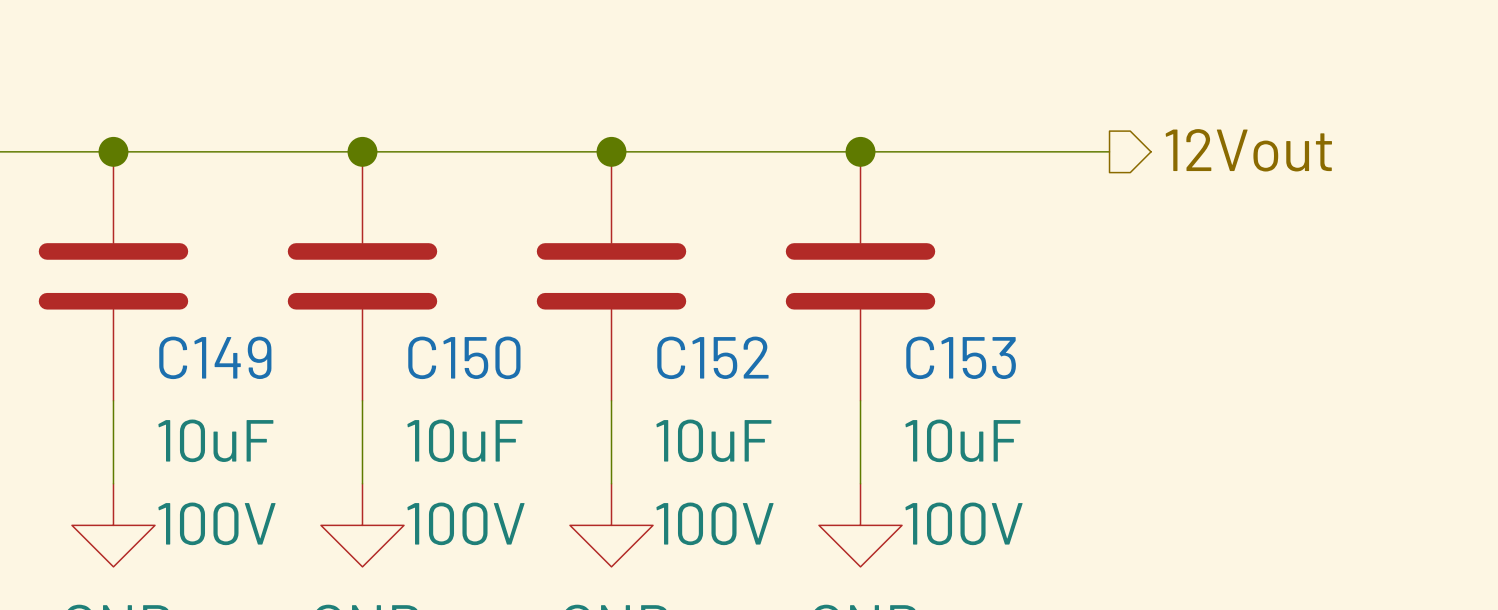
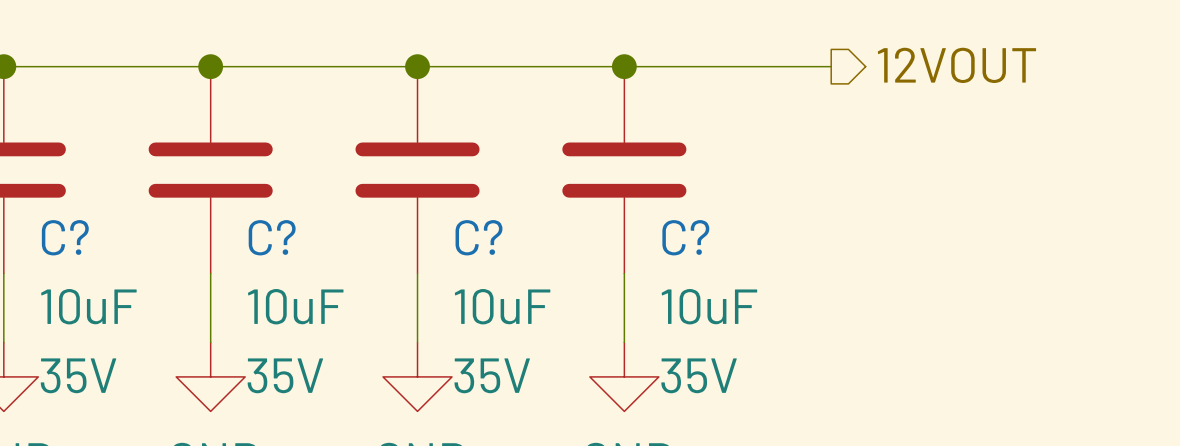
hierarchical label: 12Vout (1248, 150) -> 12VOUT (956, 65)
C149 name: C149 (215, 357) -> C? (65, 237)
C150 name: C150 (464, 357) -> C? (272, 237)
C152 name: C152 (712, 357) -> C? (479, 237)
C153 name: C153 (961, 357) -> C? (685, 237)
C149 text: 100V (217, 523) -> 35V (78, 375)
C150 text: 100V (466, 523) -> 35V (285, 375)
C152 text: 100V (715, 523) -> 35V (492, 375)
C153 text: 100V (964, 523) -> 35V (699, 375)

